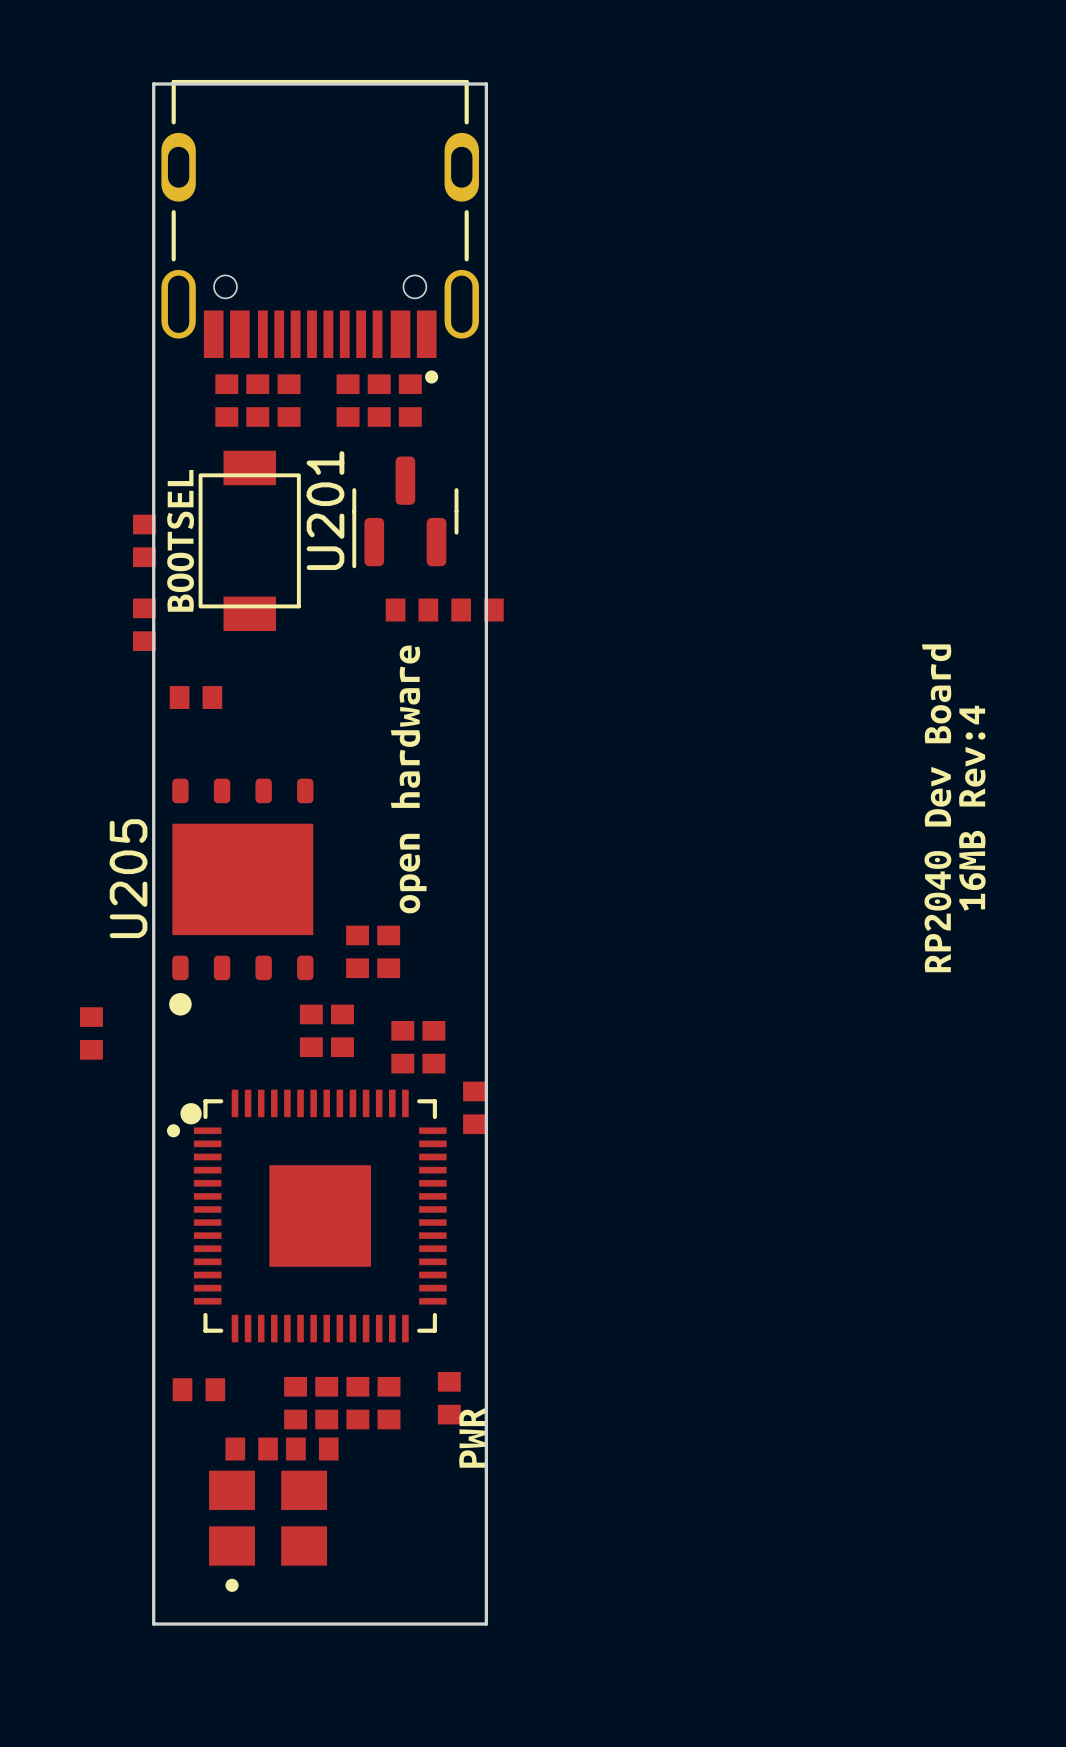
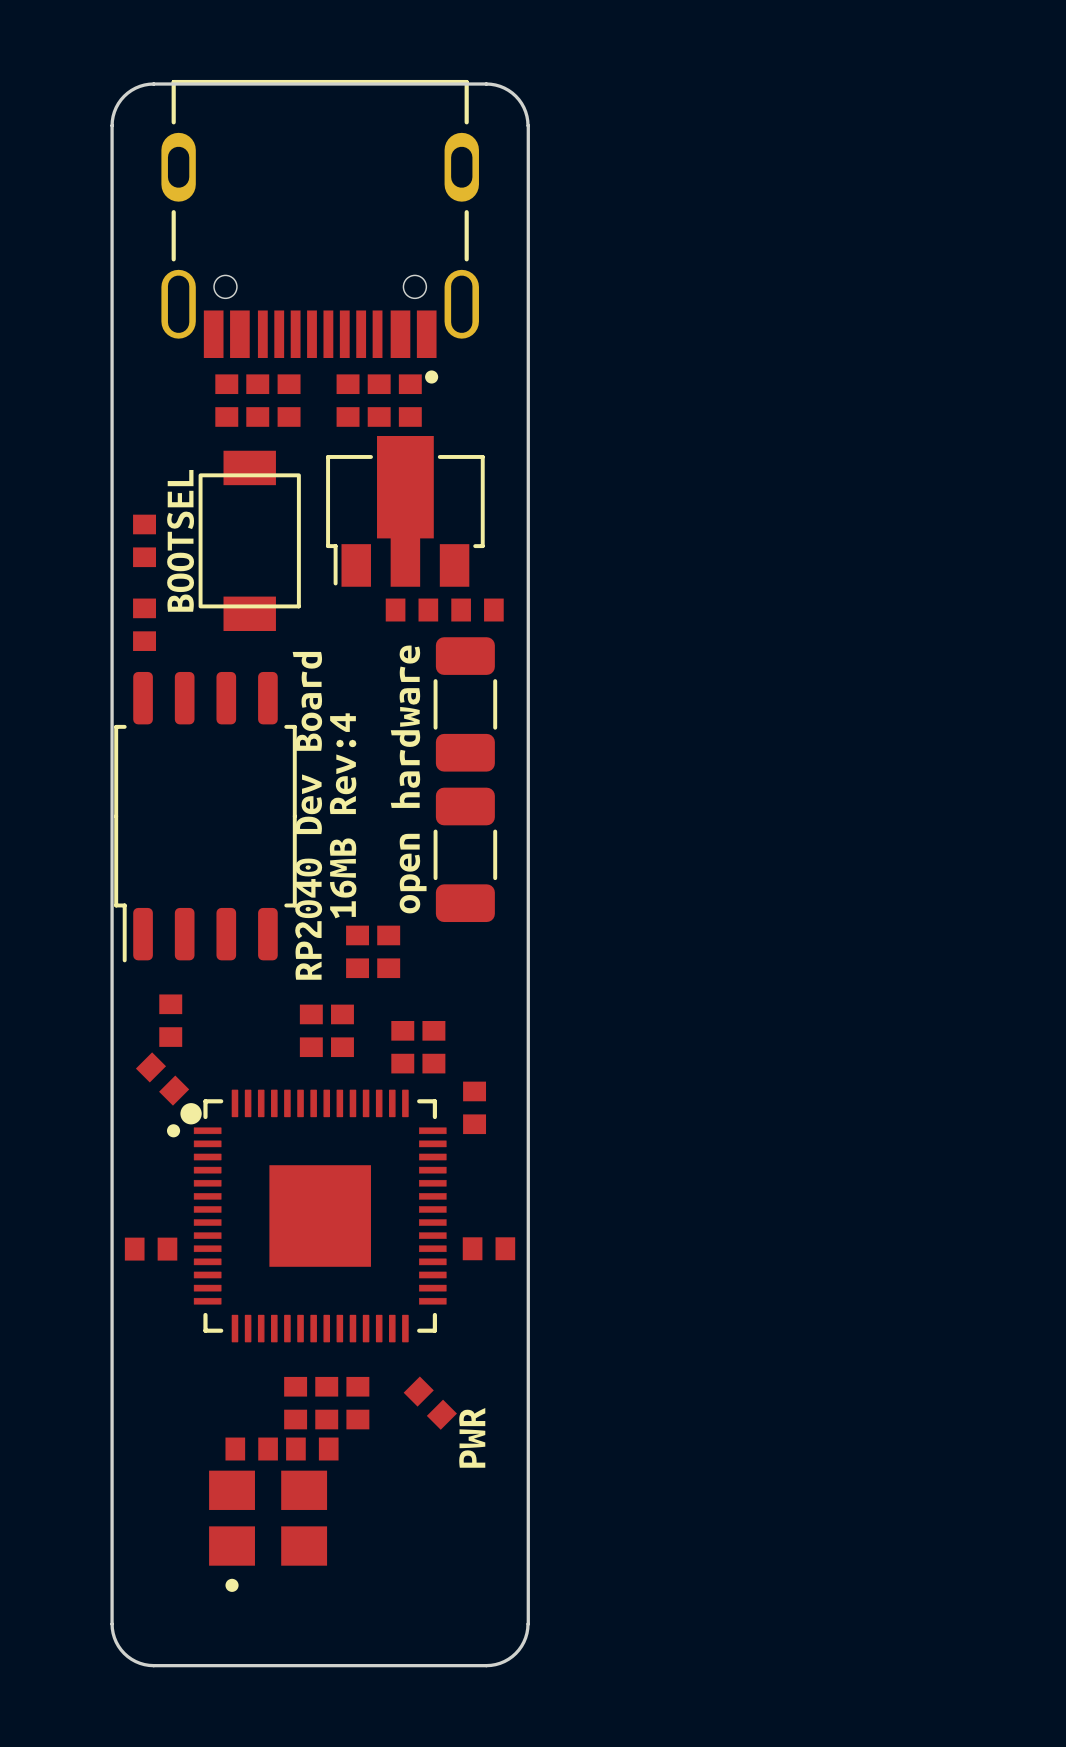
board edge: (153, 84) (153, 1624) (486, 1624) (486, 84) -> (528, 125) (525, 111) (515, 96) (504, 88) (486, 84)
board edge: none -> (153, 84) (139, 86) (124, 96) (114, 111) (112, 125) (113, 1633) (118, 1646) (127, 1656) (135, 1661) (149, 1665) (486, 1665) (504, 1661) (515, 1653) (523, 1642) (528, 1624)
board edge: none -> (528, 125) (528, 1624)
part: none -> (405, 511)
U201: (405, 512) -> none
part: (195, 697) -> none
part: none -> (465, 704)
drawing position: (936, 808) -> (307, 815)
drawing position: (972, 808) -> (343, 815)
part: none -> (205, 817)
part: none -> (465, 854)
U205: (241, 897) -> none
part position: (91, 1033) -> (170, 1020)
part: none -> (162, 1079)
part: none -> (488, 1248)
part: none -> (151, 1249)
part: (198, 1389) -> none
part rotation: 0° (449, 1398) -> 45° counterclockwise (430, 1403)
part: (389, 1403) -> none

